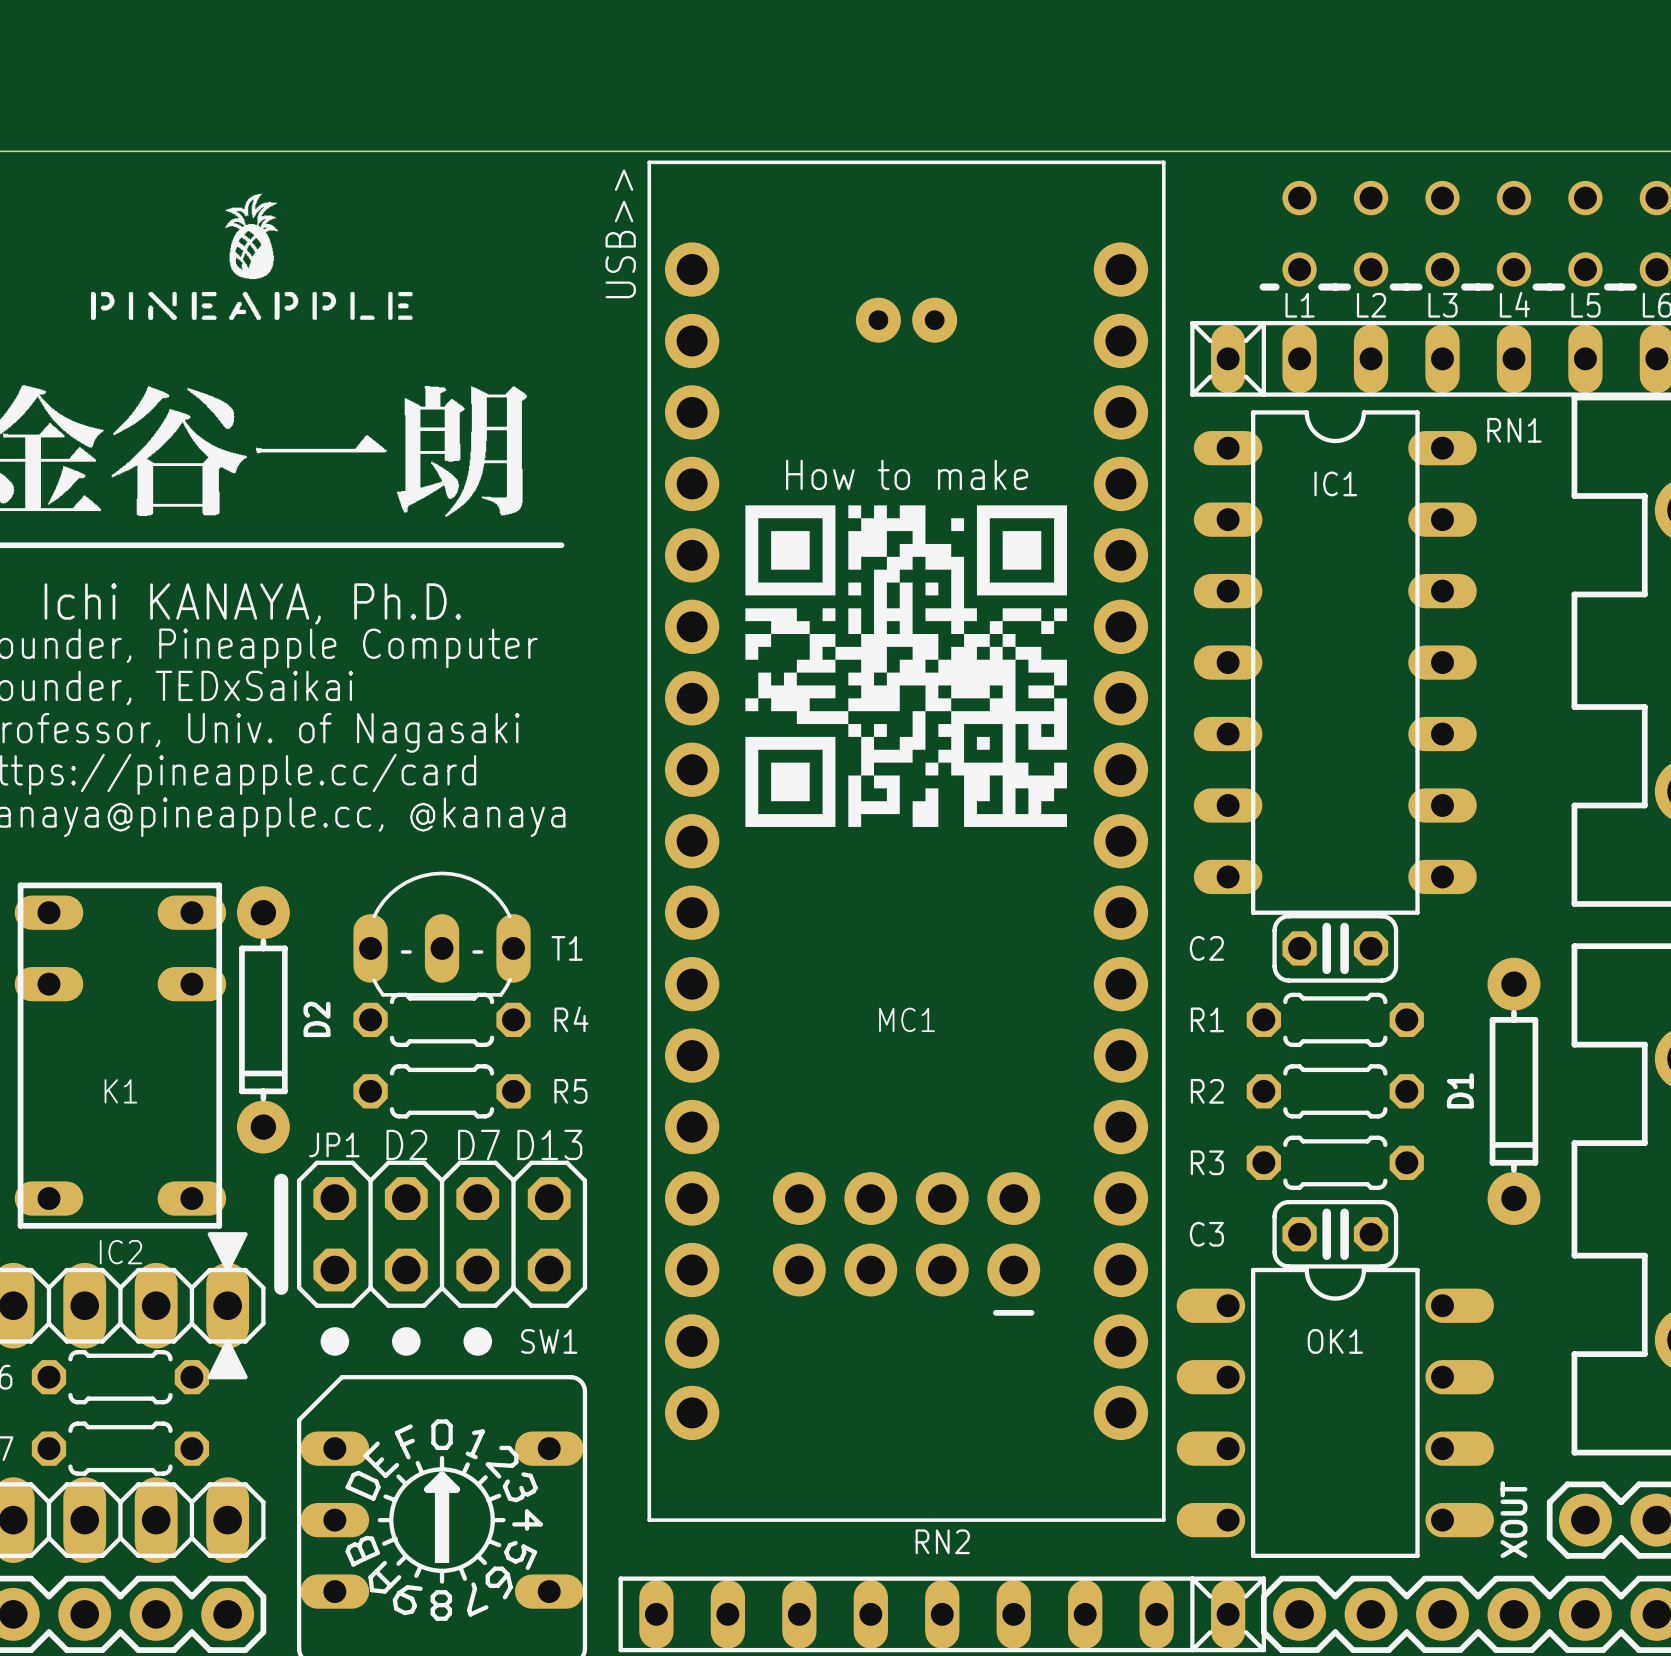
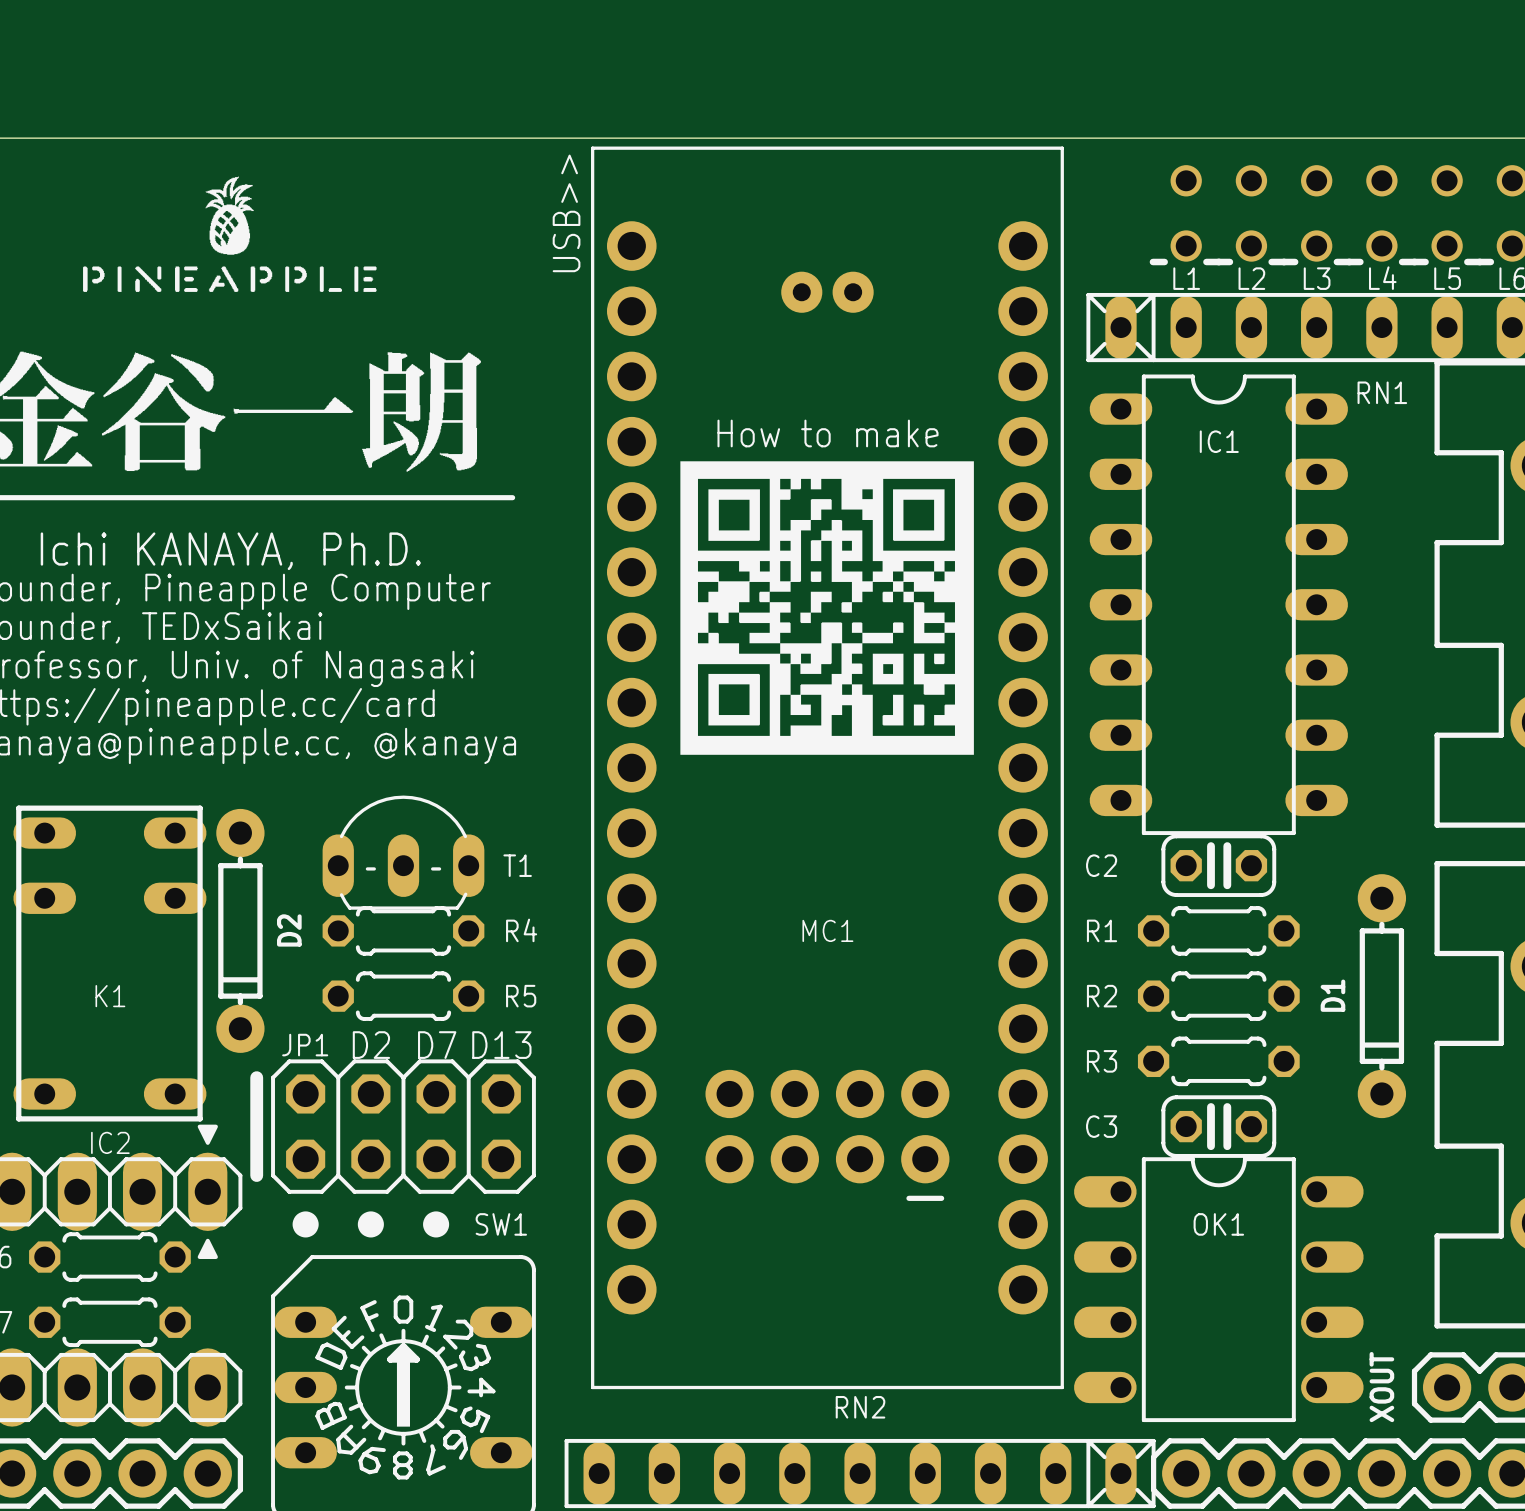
drawing shape: [745, 505, 1067, 827] -> [680, 461, 974, 755]
drawing shape: [207, 1232, 248, 1273] -> [197, 1124, 218, 1145]
drawing shape: [207, 1339, 248, 1380] -> [197, 1238, 218, 1260]

